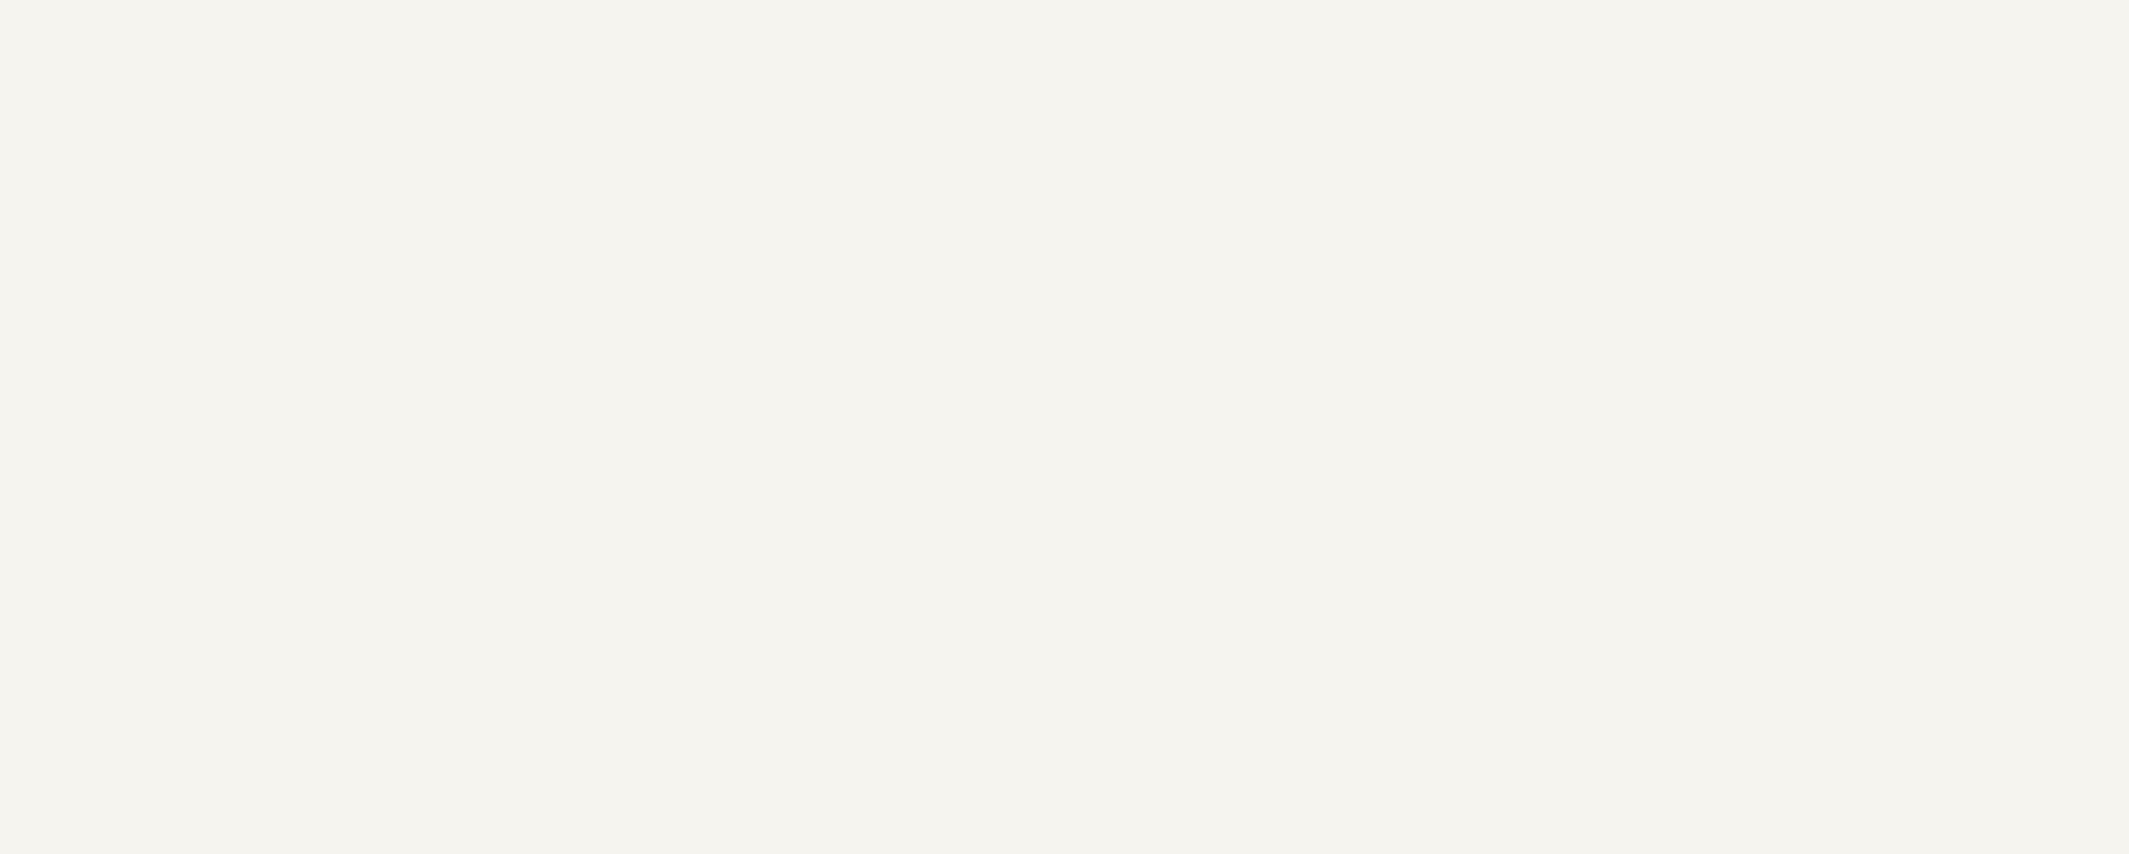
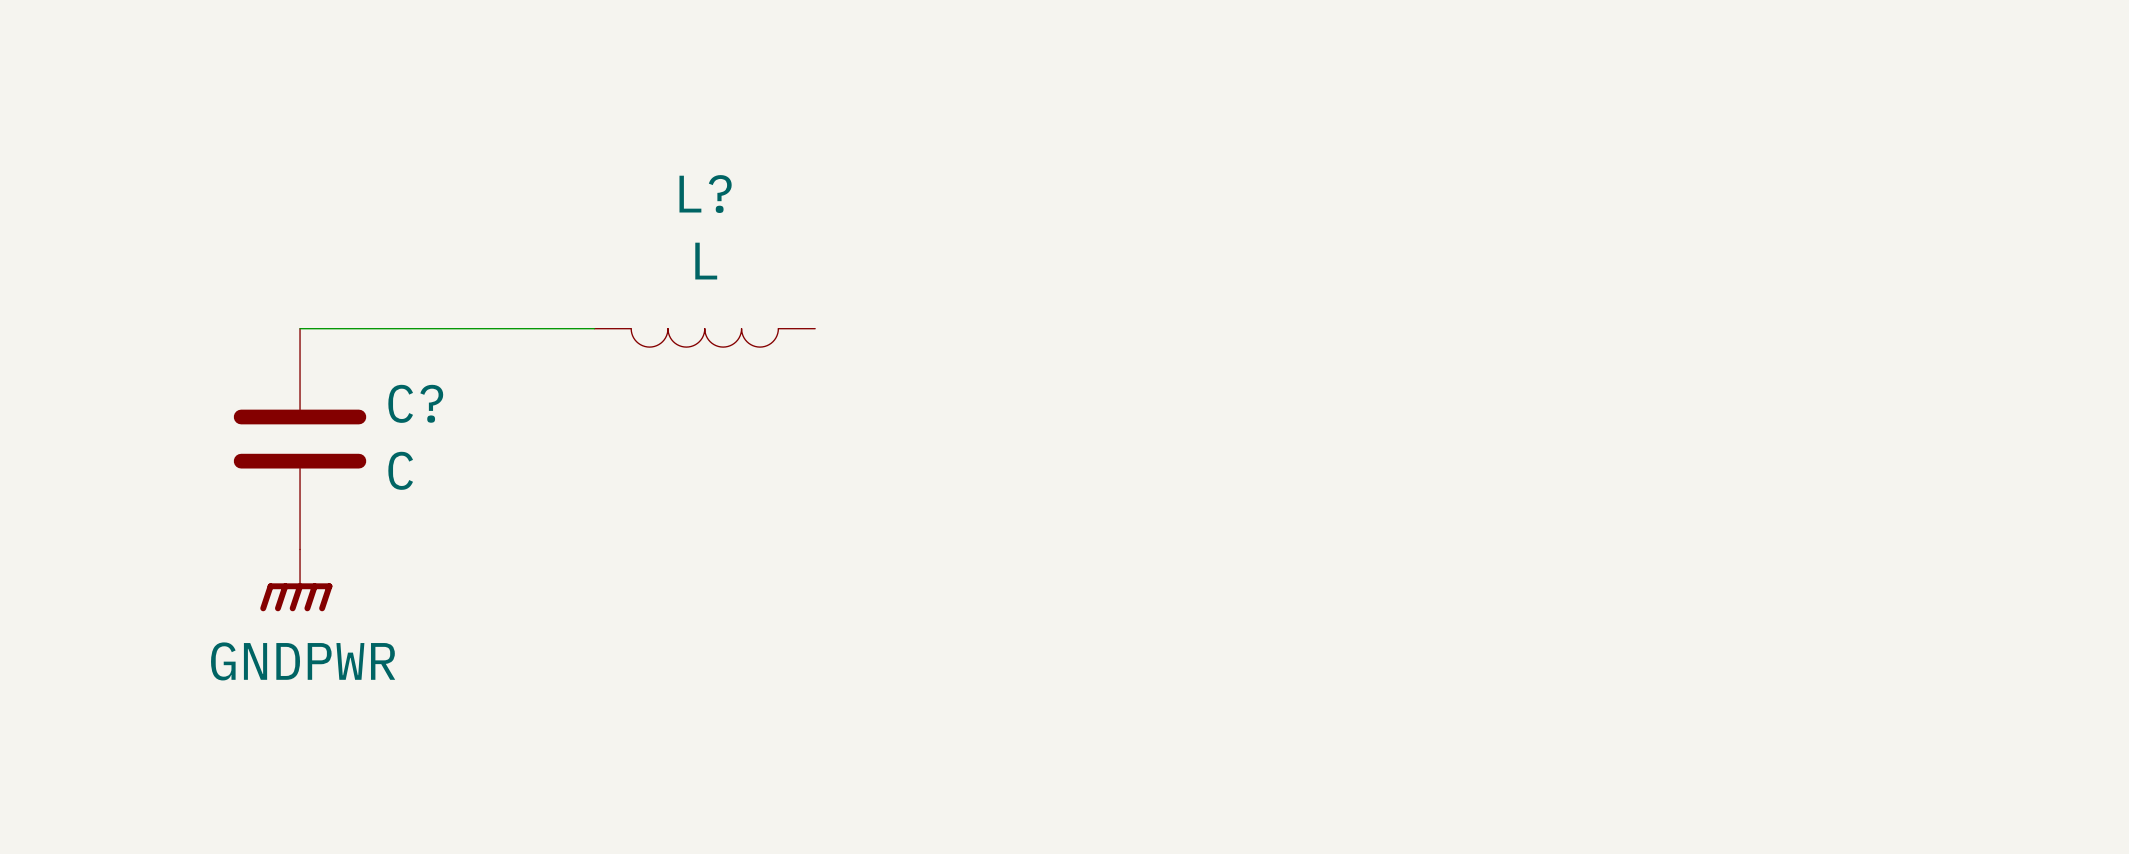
wire: none -> (300, 328) (594, 328)
L?: none -> L (704, 337)
C?: none -> C (300, 439)
power symbol: none -> GNDPWR (296, 580)

